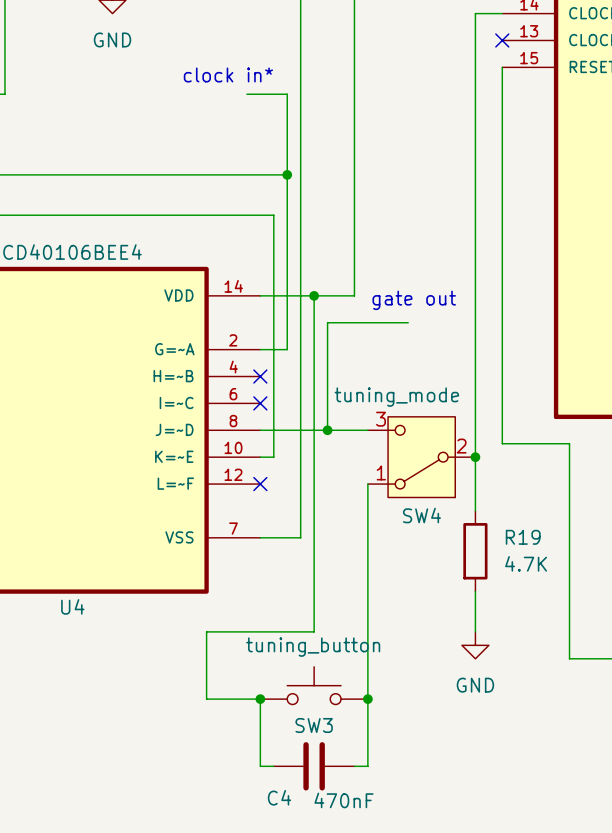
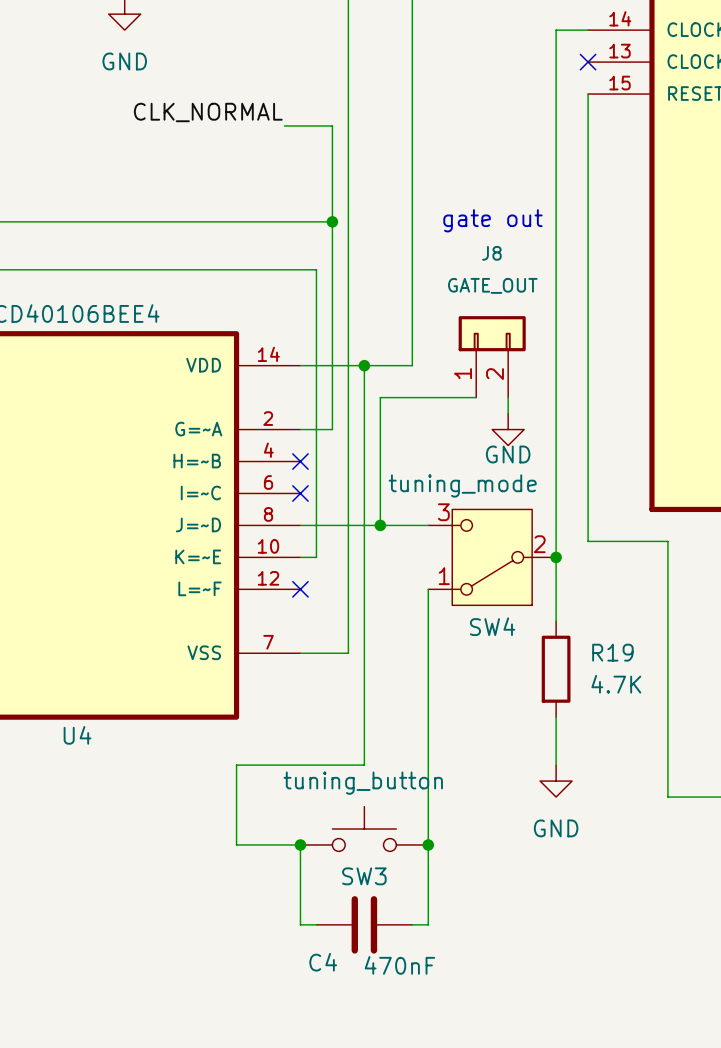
text: clock in* (228, 74) -> none
label: none -> CLK_NORMAL (208, 112)
J8: none -> GATE_OUT (492, 356)
text position: gate out (414, 300) -> gate out (492, 220)
wire: none -> (508, 397) (508, 413)
power symbol: none -> GND (508, 429)

